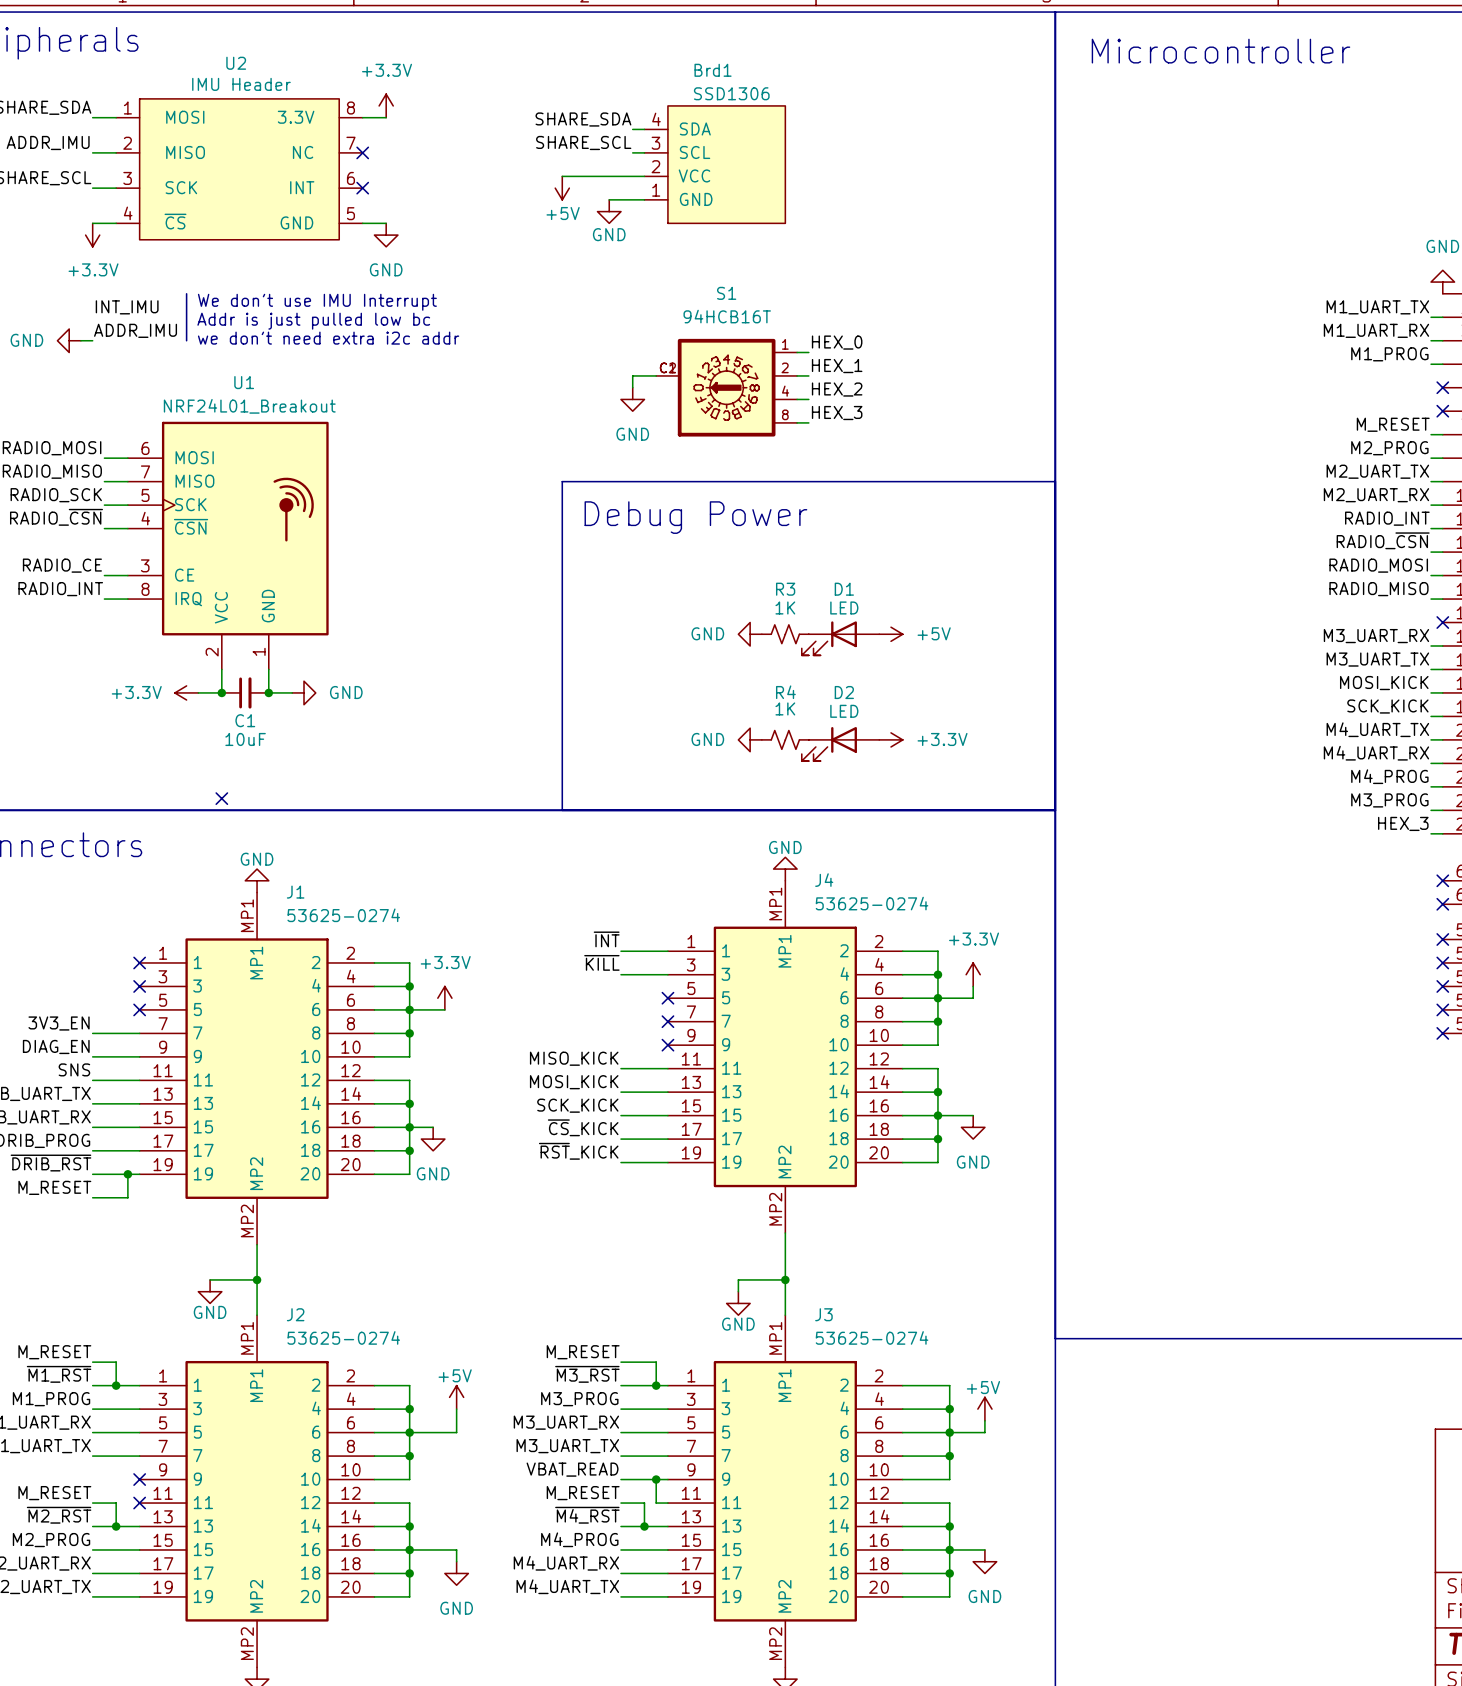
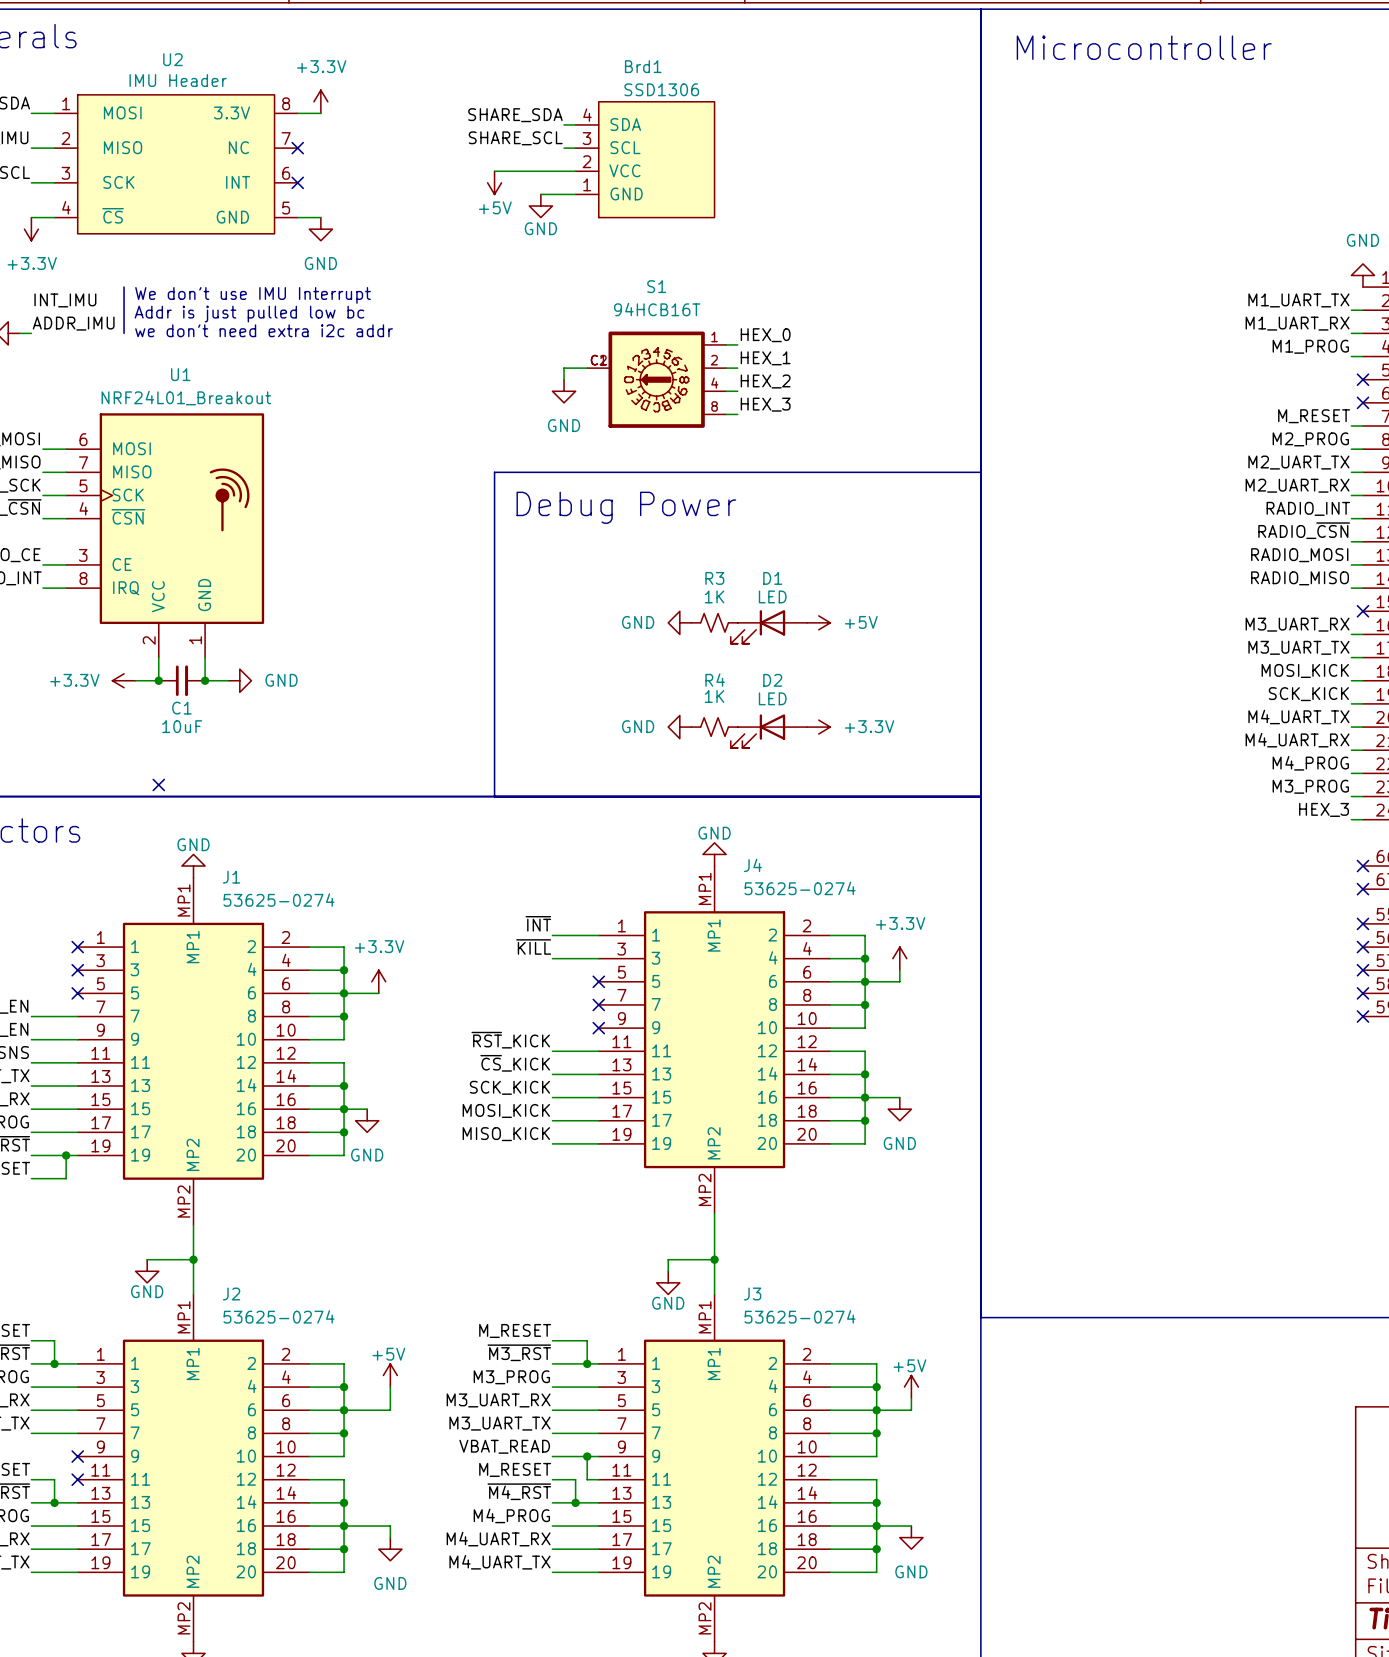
label: MISO_KICK (574, 1058) -> ~{RST}_KICK (510, 1040)
label: MOSI_KICK (574, 1082) -> ~{CS}_KICK (515, 1063)
label: ~{CS}_KICK (583, 1127) -> MOSI_KICK (506, 1110)
label: ~{RST}_KICK (578, 1151) -> MISO_KICK (506, 1134)

